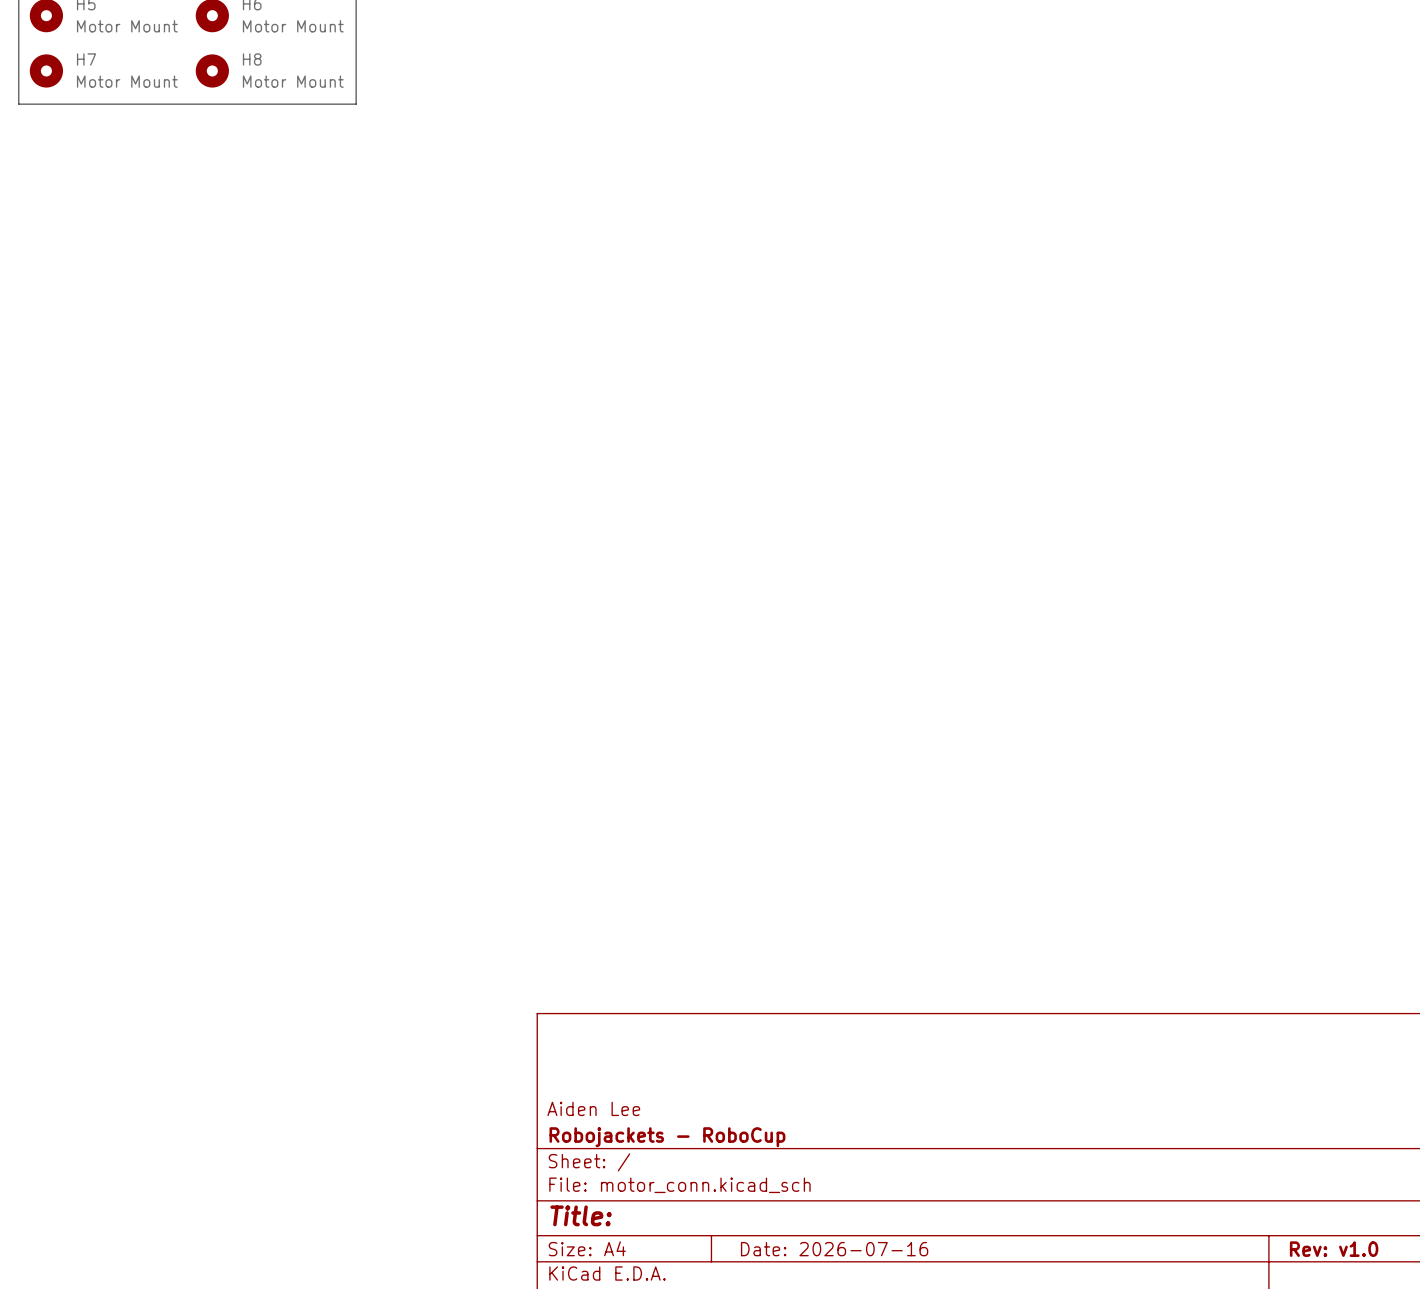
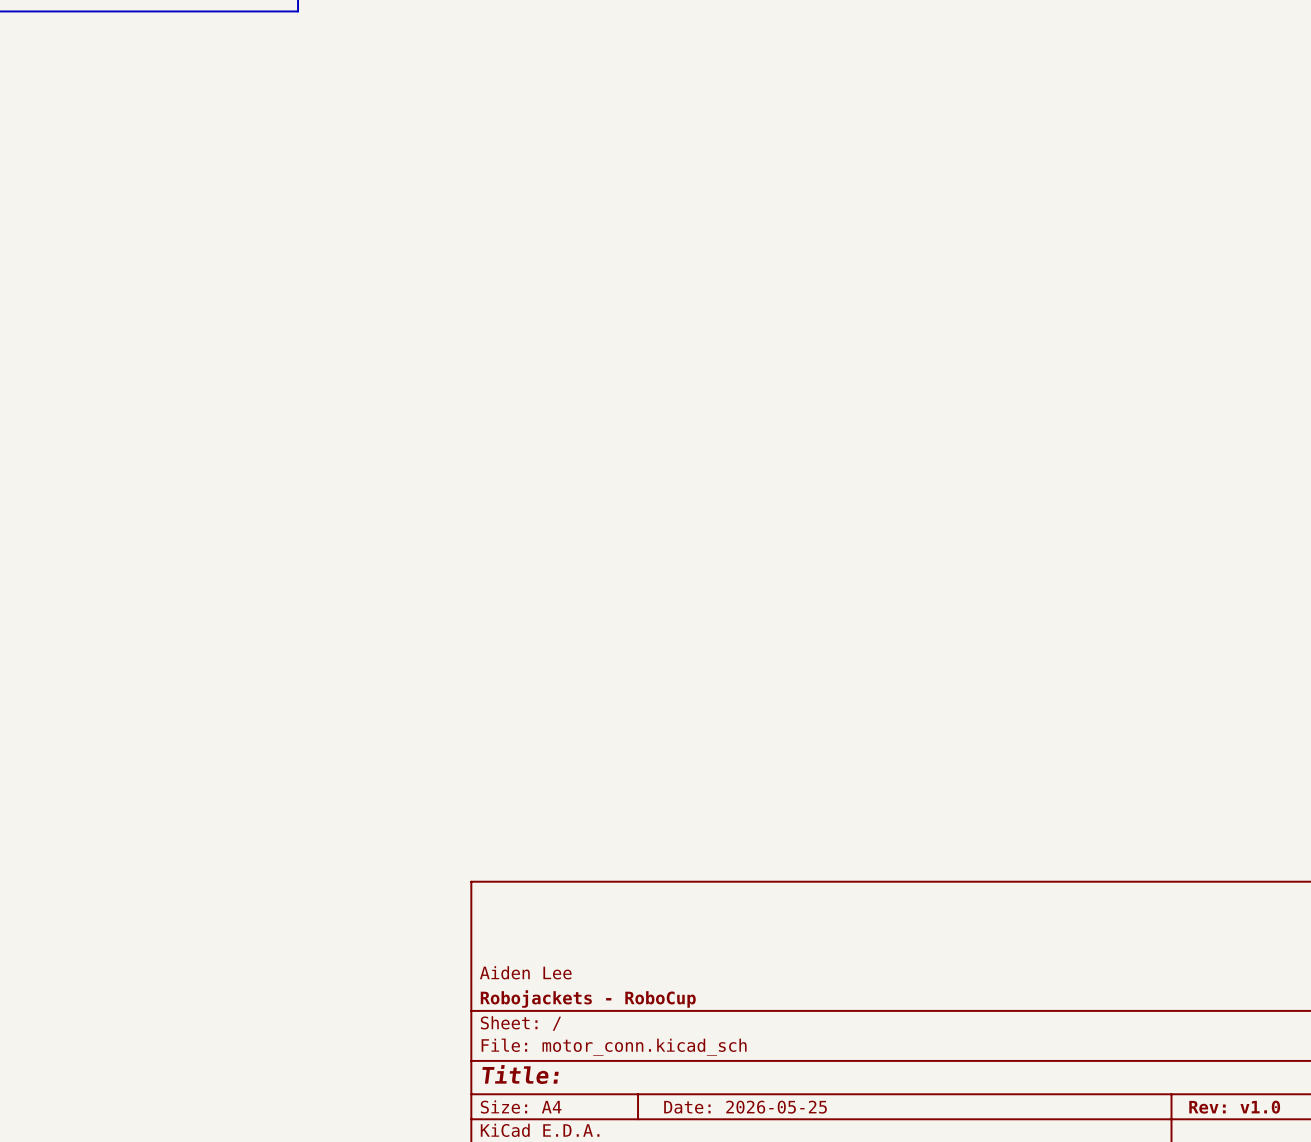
title block: Date: 2026-07-16 (834, 1249) -> Date: 2026-05-25 (745, 1107)

